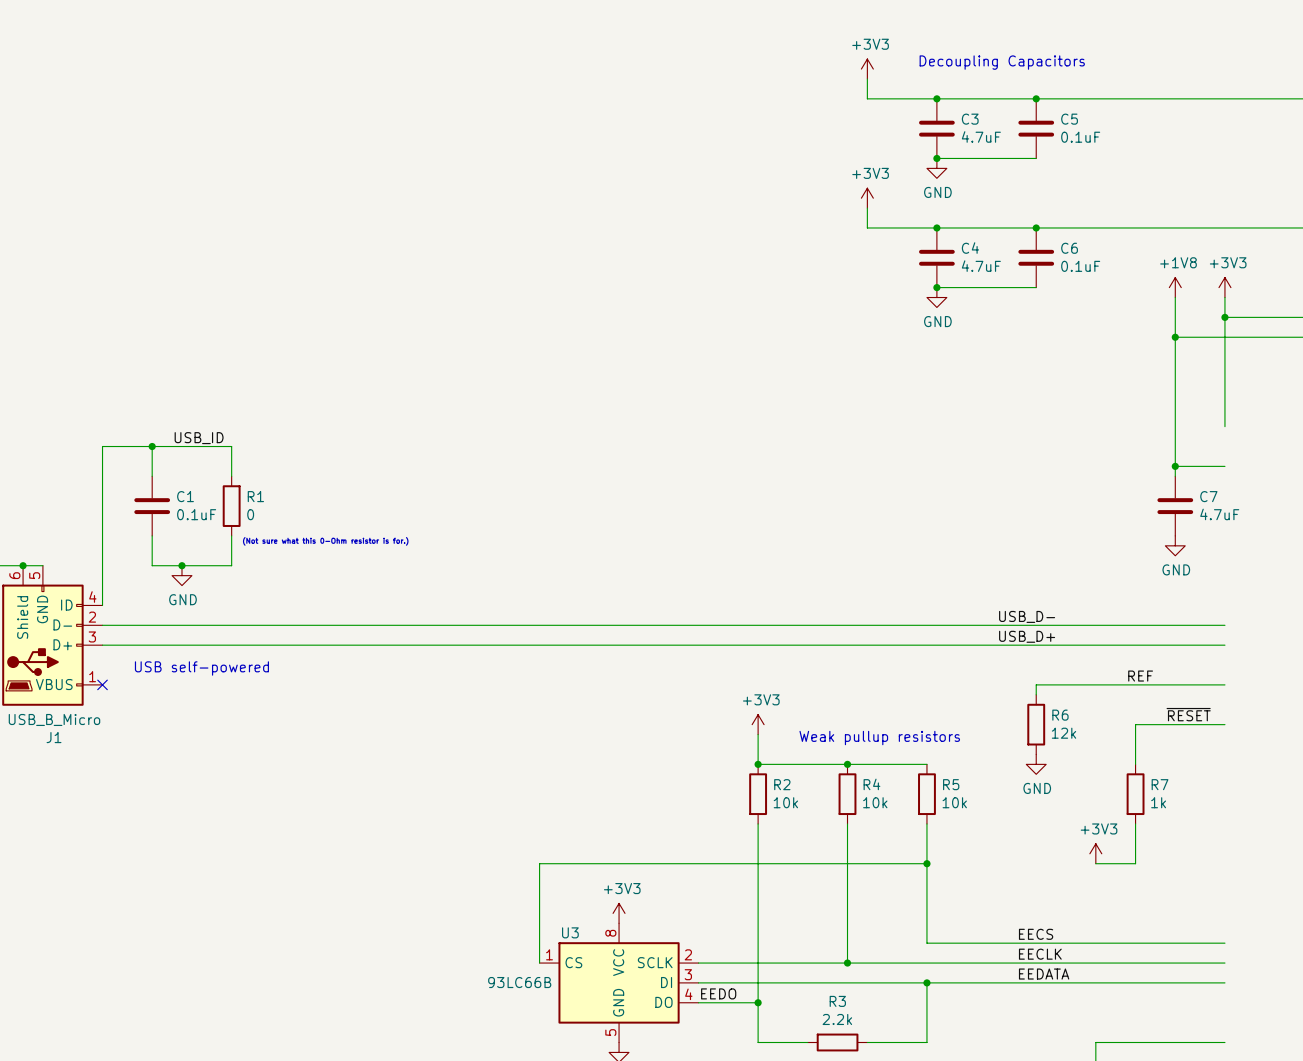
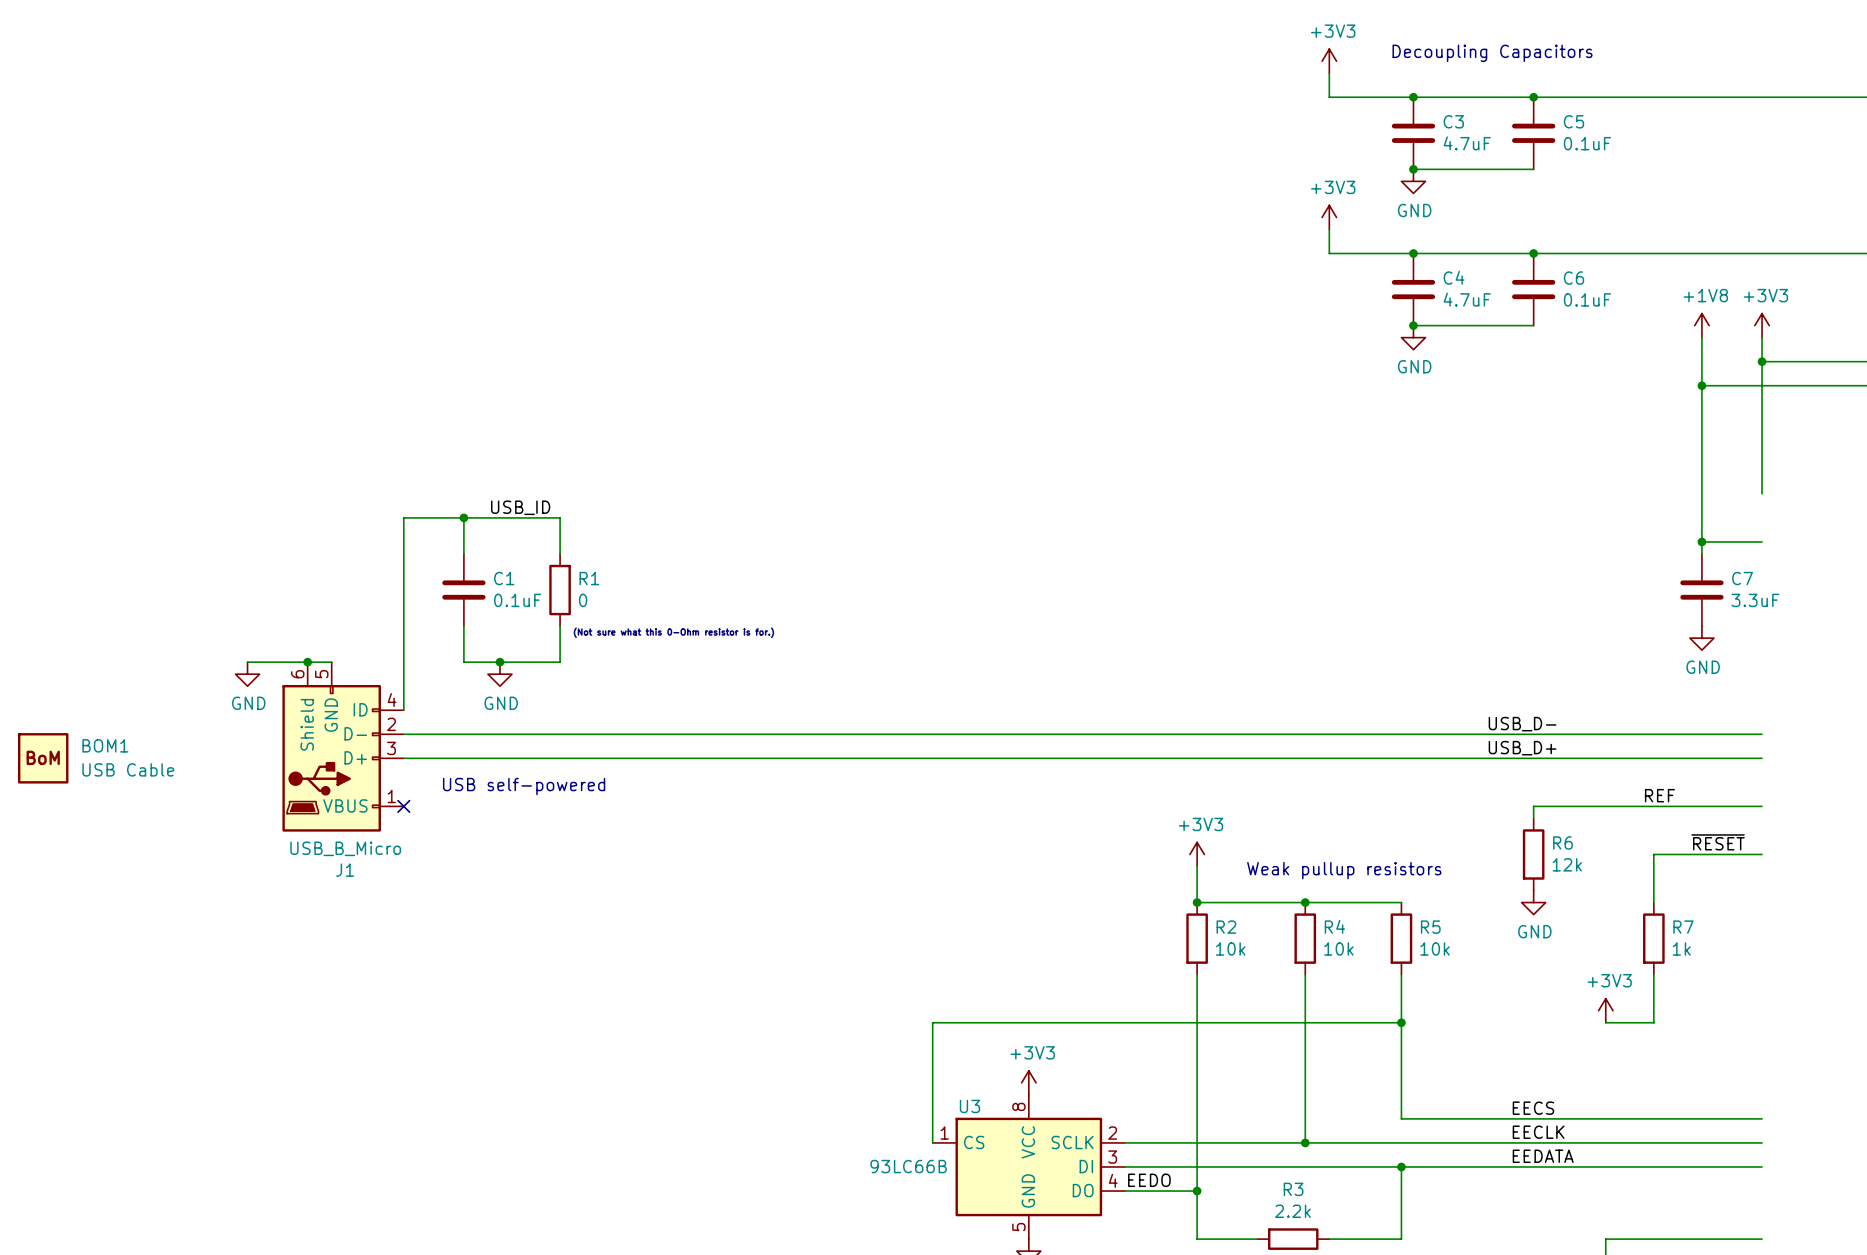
C7 value: 4.7uF (1219, 514) -> 3.3uF (1755, 600)

